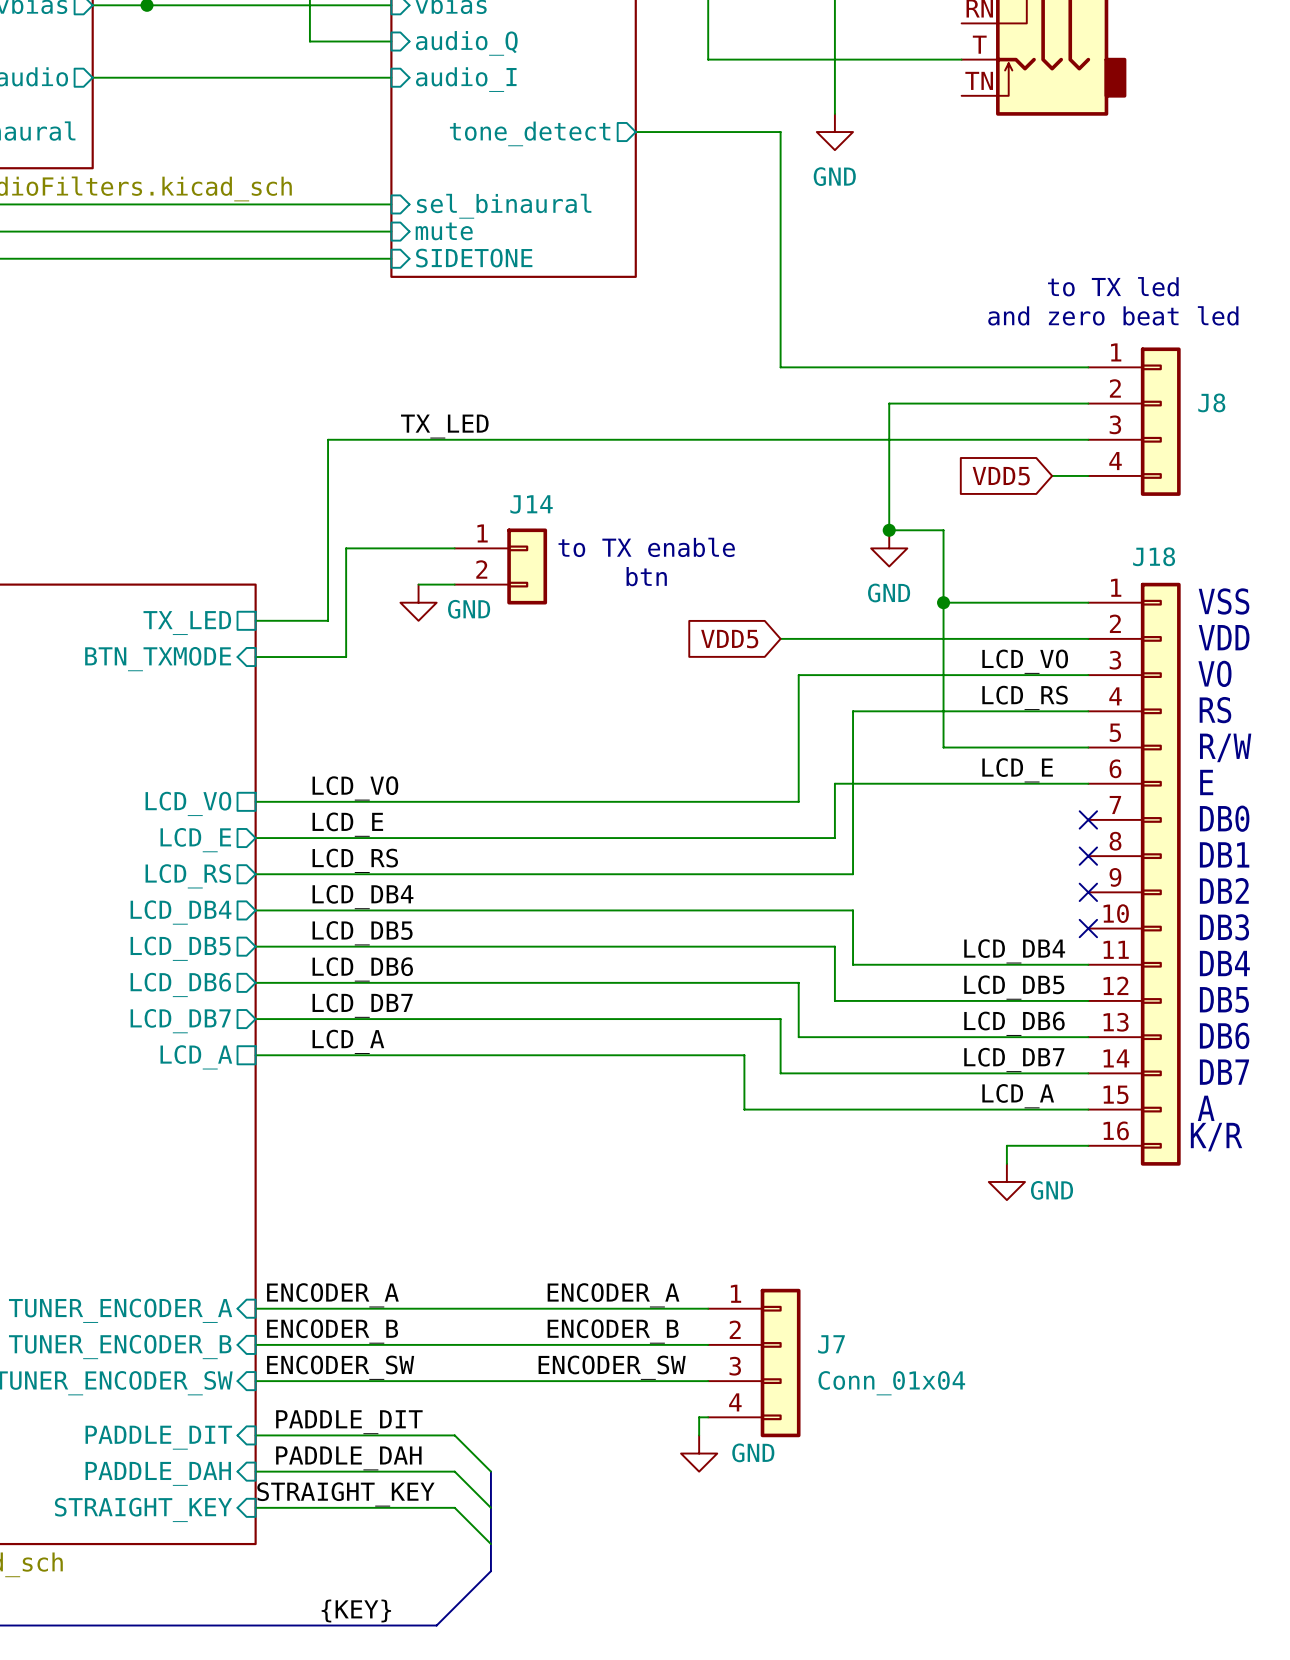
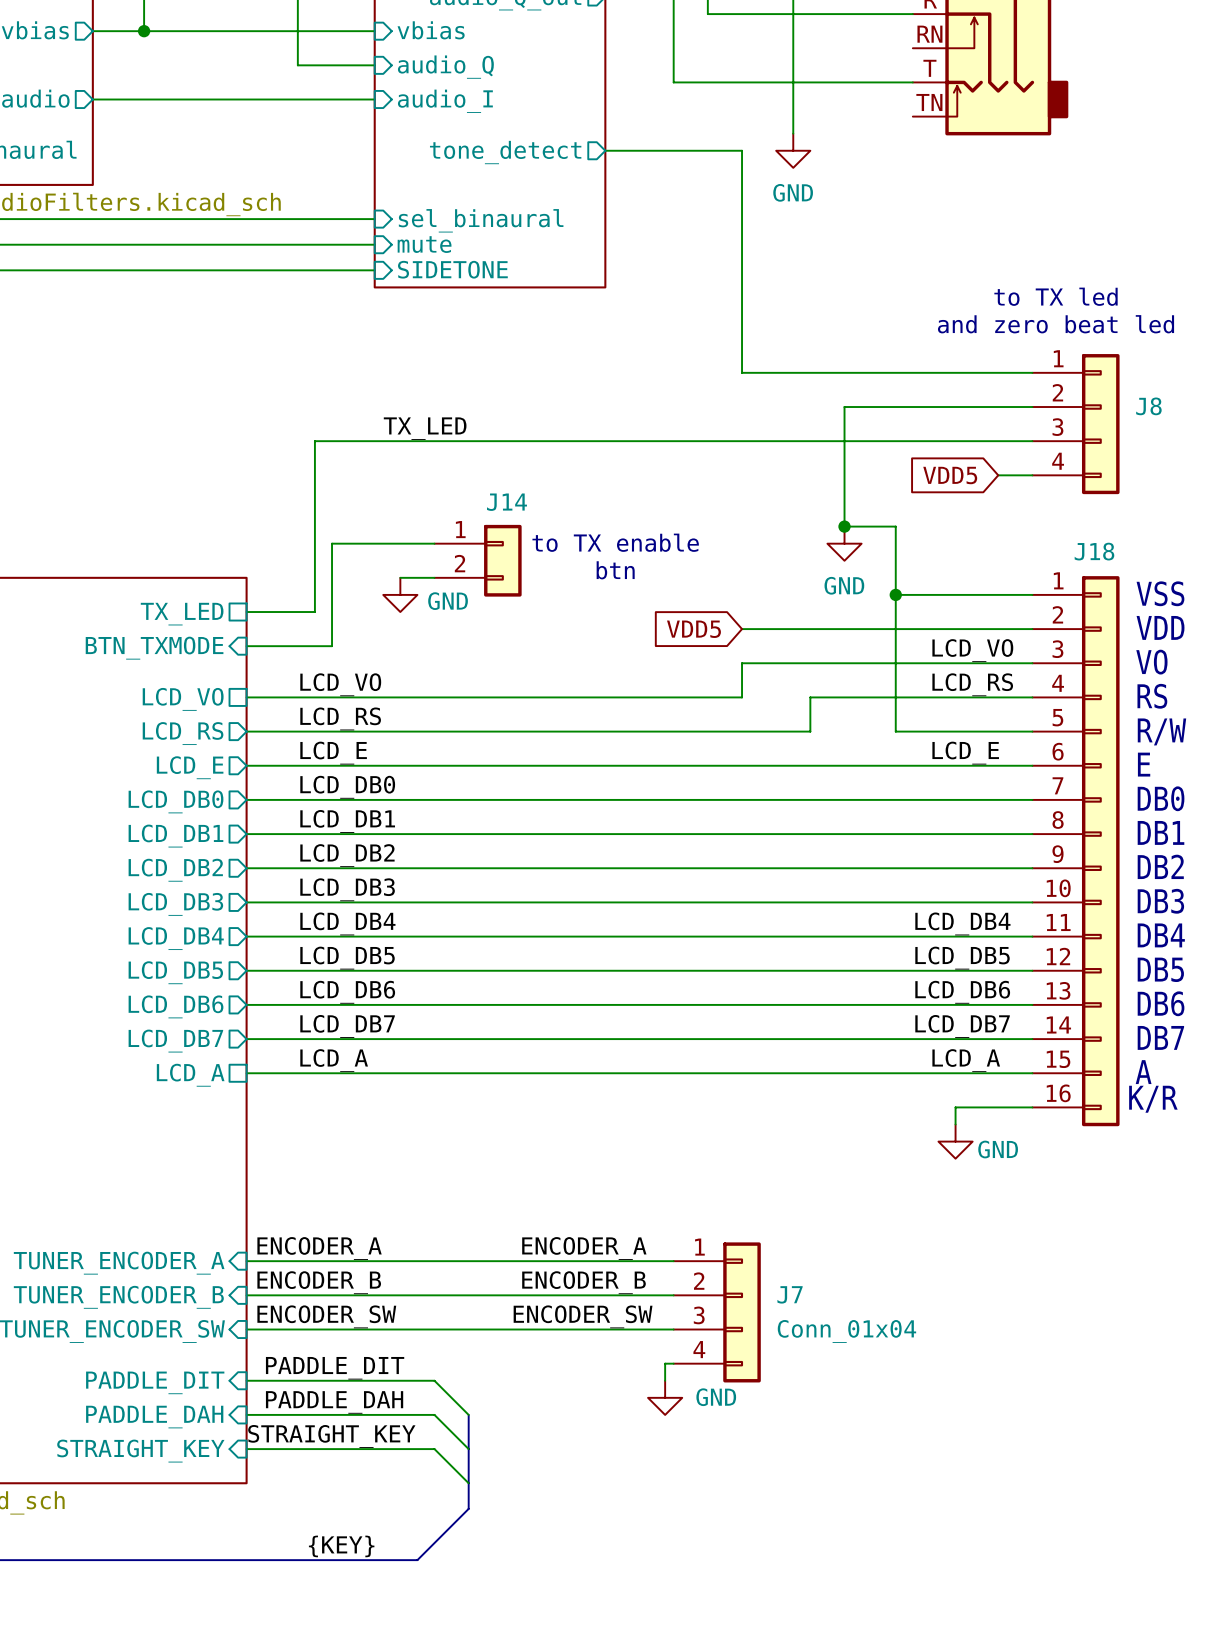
wire: (798, 675) (798, 801) (255, 801) -> (759, 663) (742, 663) (742, 697) (246, 697)
wire: (853, 747) (853, 874) (255, 874) -> (810, 731) (246, 731)
wire: (834, 783) (834, 838) (255, 838) -> (793, 765) (246, 765)
label position: LCD_VO (355, 788) -> LCD_VO (340, 684)
sheet pin position: LCD_VO (188, 803) -> LCD_VO (183, 699)
label: none -> LCD_DB0 (347, 787)
wire: none -> (246, 799) (1032, 799)
no-connect mark: (1088, 819) -> none
sheet pin: none -> LCD_DB0 (176, 801)
label position: LCD_E (347, 824) -> LCD_E (333, 753)
sheet pin position: LCD_E (195, 840) -> LCD_E (190, 767)
label: none -> LCD_DB1 (347, 821)
wire: none -> (246, 834) (1032, 834)
no-connect mark: (1088, 856) -> none
sheet pin: none -> LCD_DB1 (175, 836)
label position: LCD_RS (355, 860) -> LCD_RS (340, 718)
sheet pin position: LCD_RS (188, 876) -> LCD_RS (183, 733)
label: none -> LCD_DB2 (347, 855)
wire: none -> (246, 868) (1032, 868)
no-connect mark: (1088, 892) -> none
sheet pin: none -> LCD_DB2 (175, 870)
label position: LCD_DB4 (362, 897) -> LCD_DB4 (347, 923)
wire: (255, 910) (853, 910) (853, 964) -> (246, 936) (810, 936)
sheet pin position: LCD_DB4 (181, 912) -> LCD_DB4 (176, 938)
label: none -> LCD_DB3 (347, 889)
wire: none -> (246, 902) (1032, 902)
no-connect mark: (1088, 928) -> none
sheet pin: none -> LCD_DB3 (175, 904)
label position: LCD_DB5 (362, 933) -> LCD_DB5 (347, 958)
wire: (255, 946) (834, 946) (834, 1000) -> (246, 970) (793, 970)
sheet pin position: LCD_DB5 (180, 948) -> LCD_DB5 (175, 972)
label position: LCD_DB6 (362, 969) -> LCD_DB6 (347, 992)
wire: (255, 982) (798, 982) (798, 1037) -> (246, 1004) (759, 1004)
sheet pin position: LCD_DB6 (180, 984) -> LCD_DB6 (176, 1006)
label position: LCD_DB7 (362, 1005) -> LCD_DB7 (347, 1026)
wire: (255, 1019) (780, 1019) (780, 1073) -> (246, 1039) (742, 1039)
sheet pin position: LCD_DB7 (180, 1021) -> LCD_DB7 (175, 1041)
label position: LCD_A (348, 1041) -> LCD_A (334, 1060)
wire: (255, 1055) (744, 1055) (744, 1109) -> (246, 1073) (707, 1073)
sheet pin position: LCD_A (196, 1057) -> LCD_A (190, 1075)

